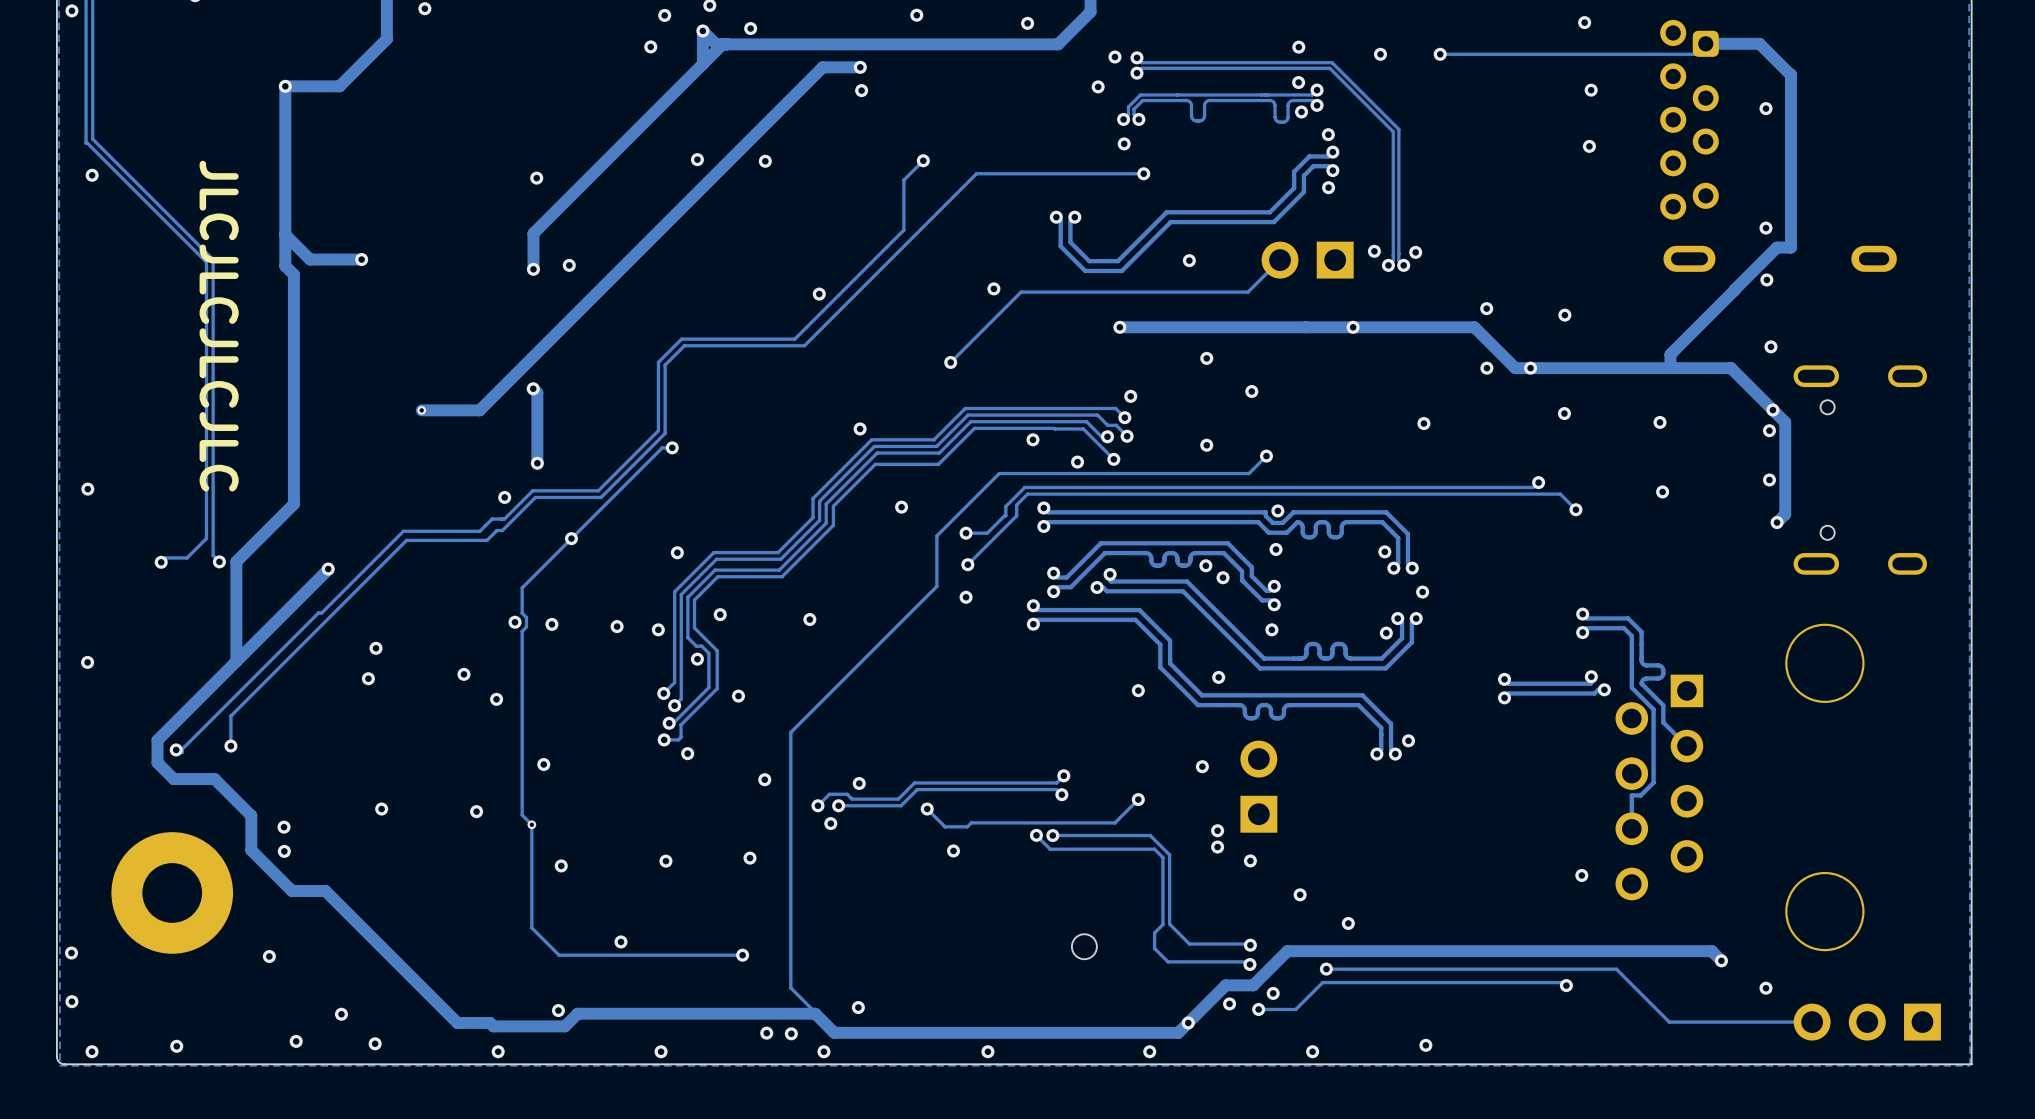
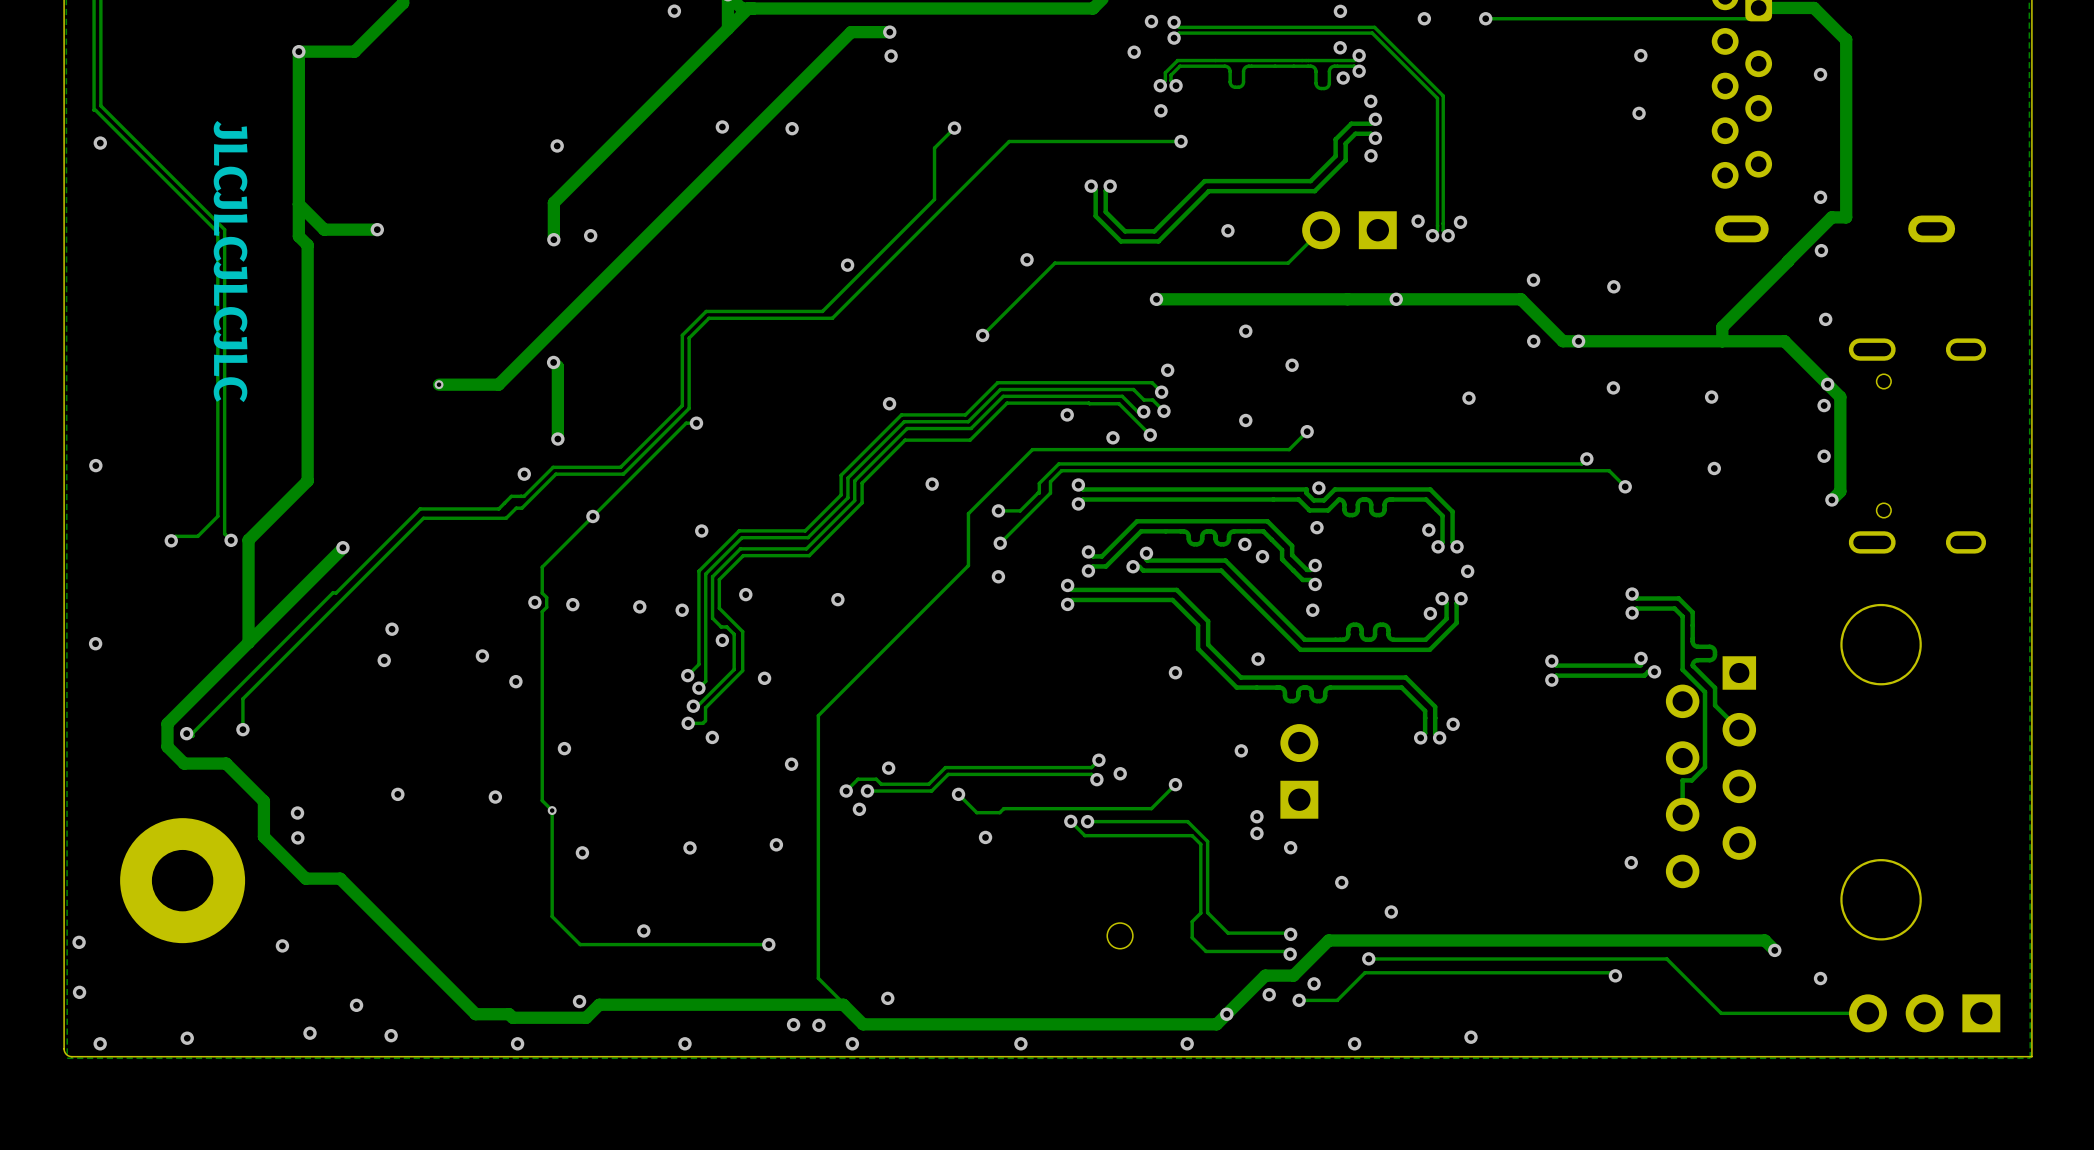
via: none -> (1120, 773)

